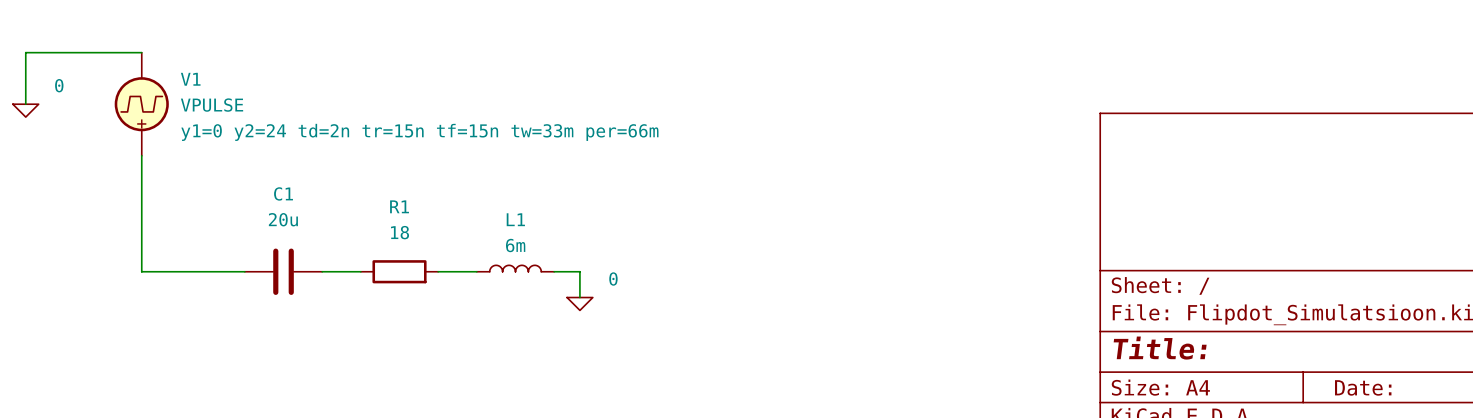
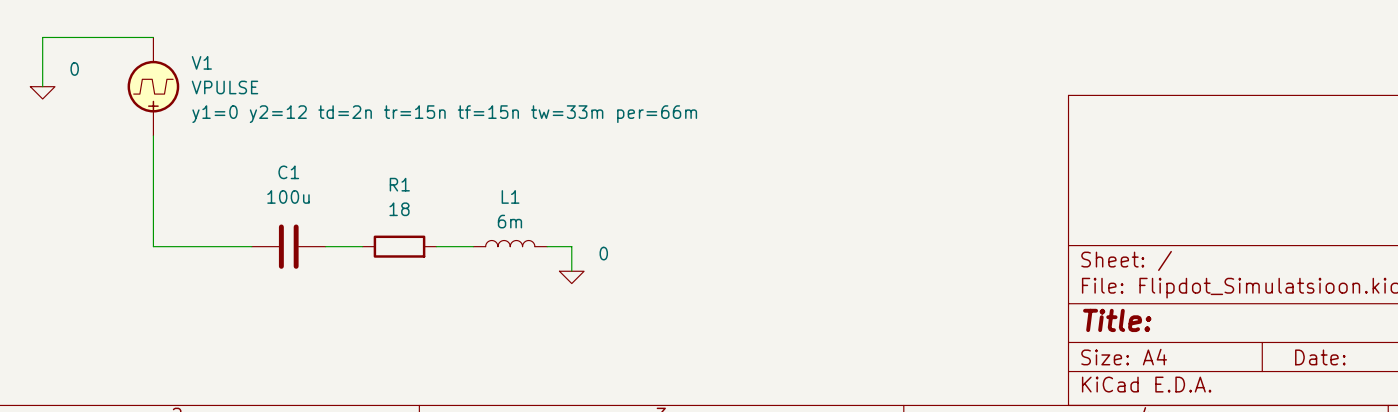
V1 text: y1=0 y2=24 td=2n tr=15n tf=15n tw=33m per=66m (419, 132) -> y1=0 y2=12 td=2n tr=15n tf=15n tw=33m per=66m (444, 114)
C1 value: 20u (283, 219) -> 100u (288, 196)

